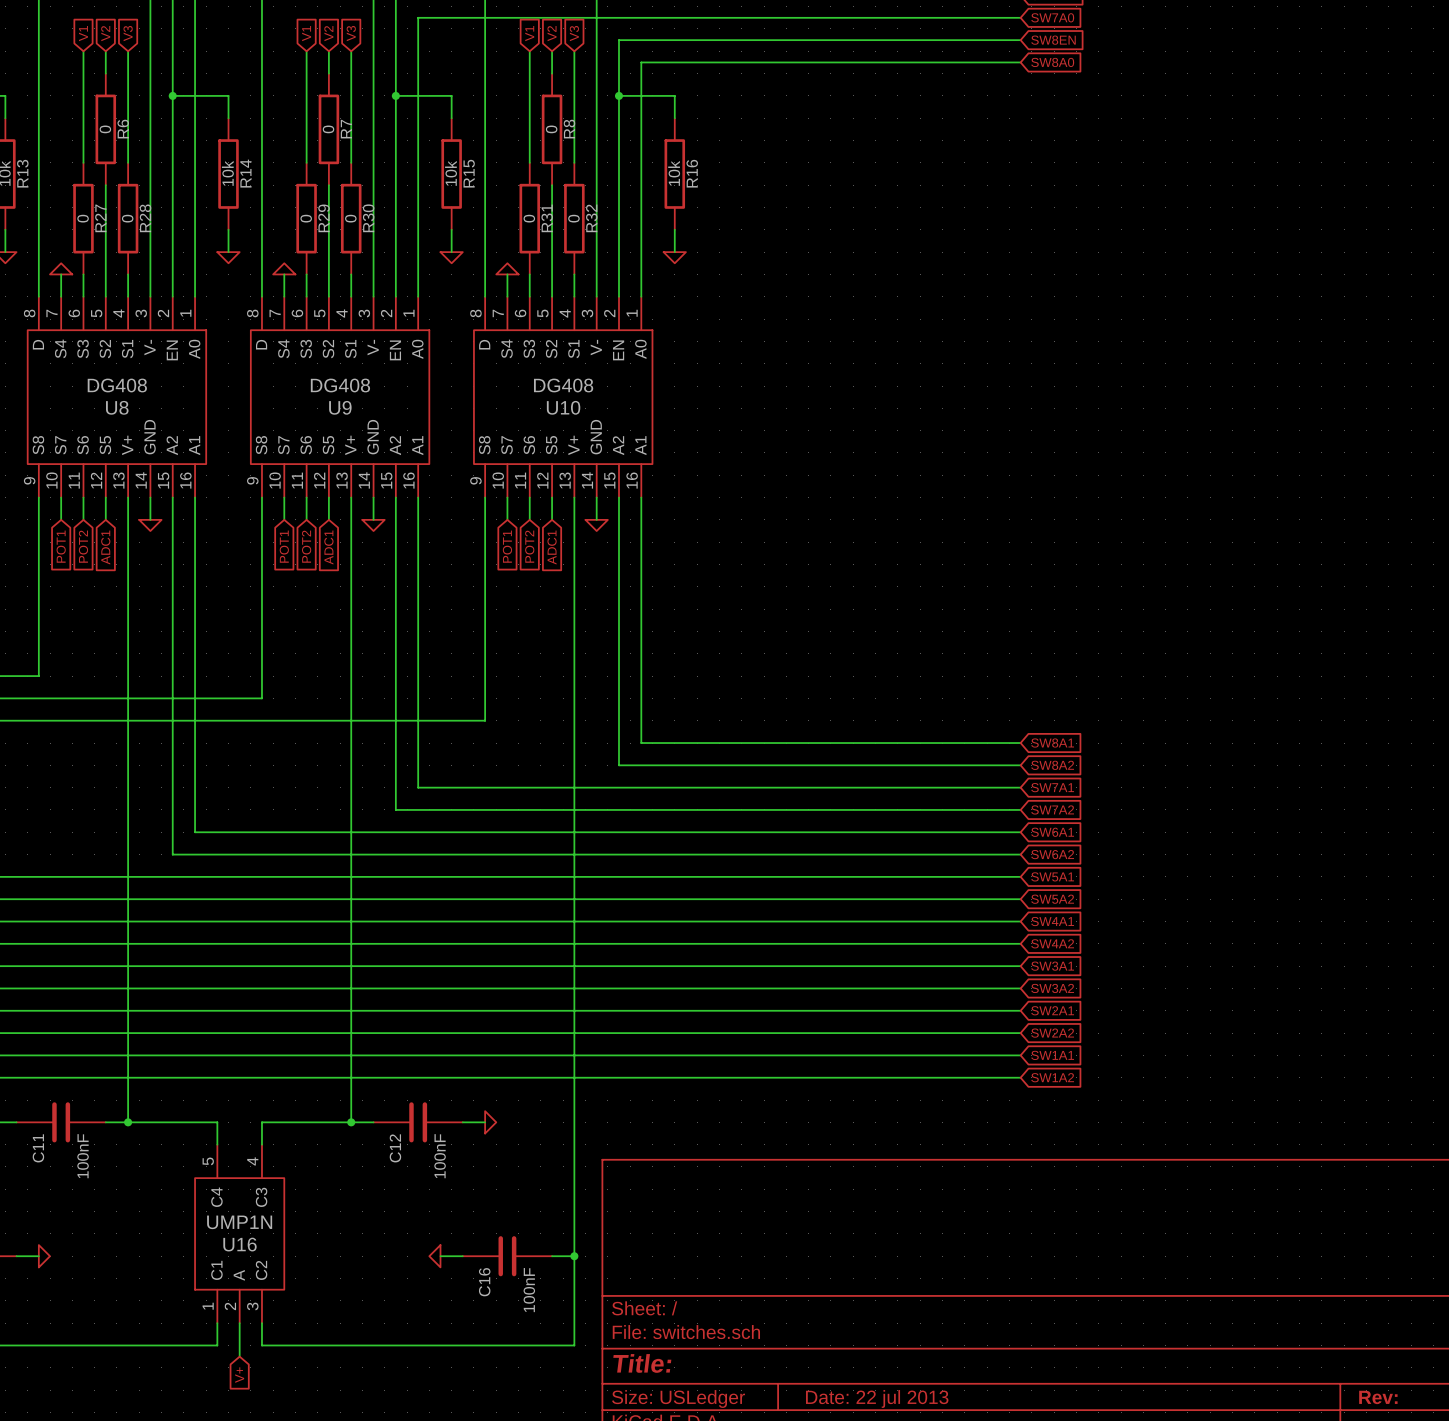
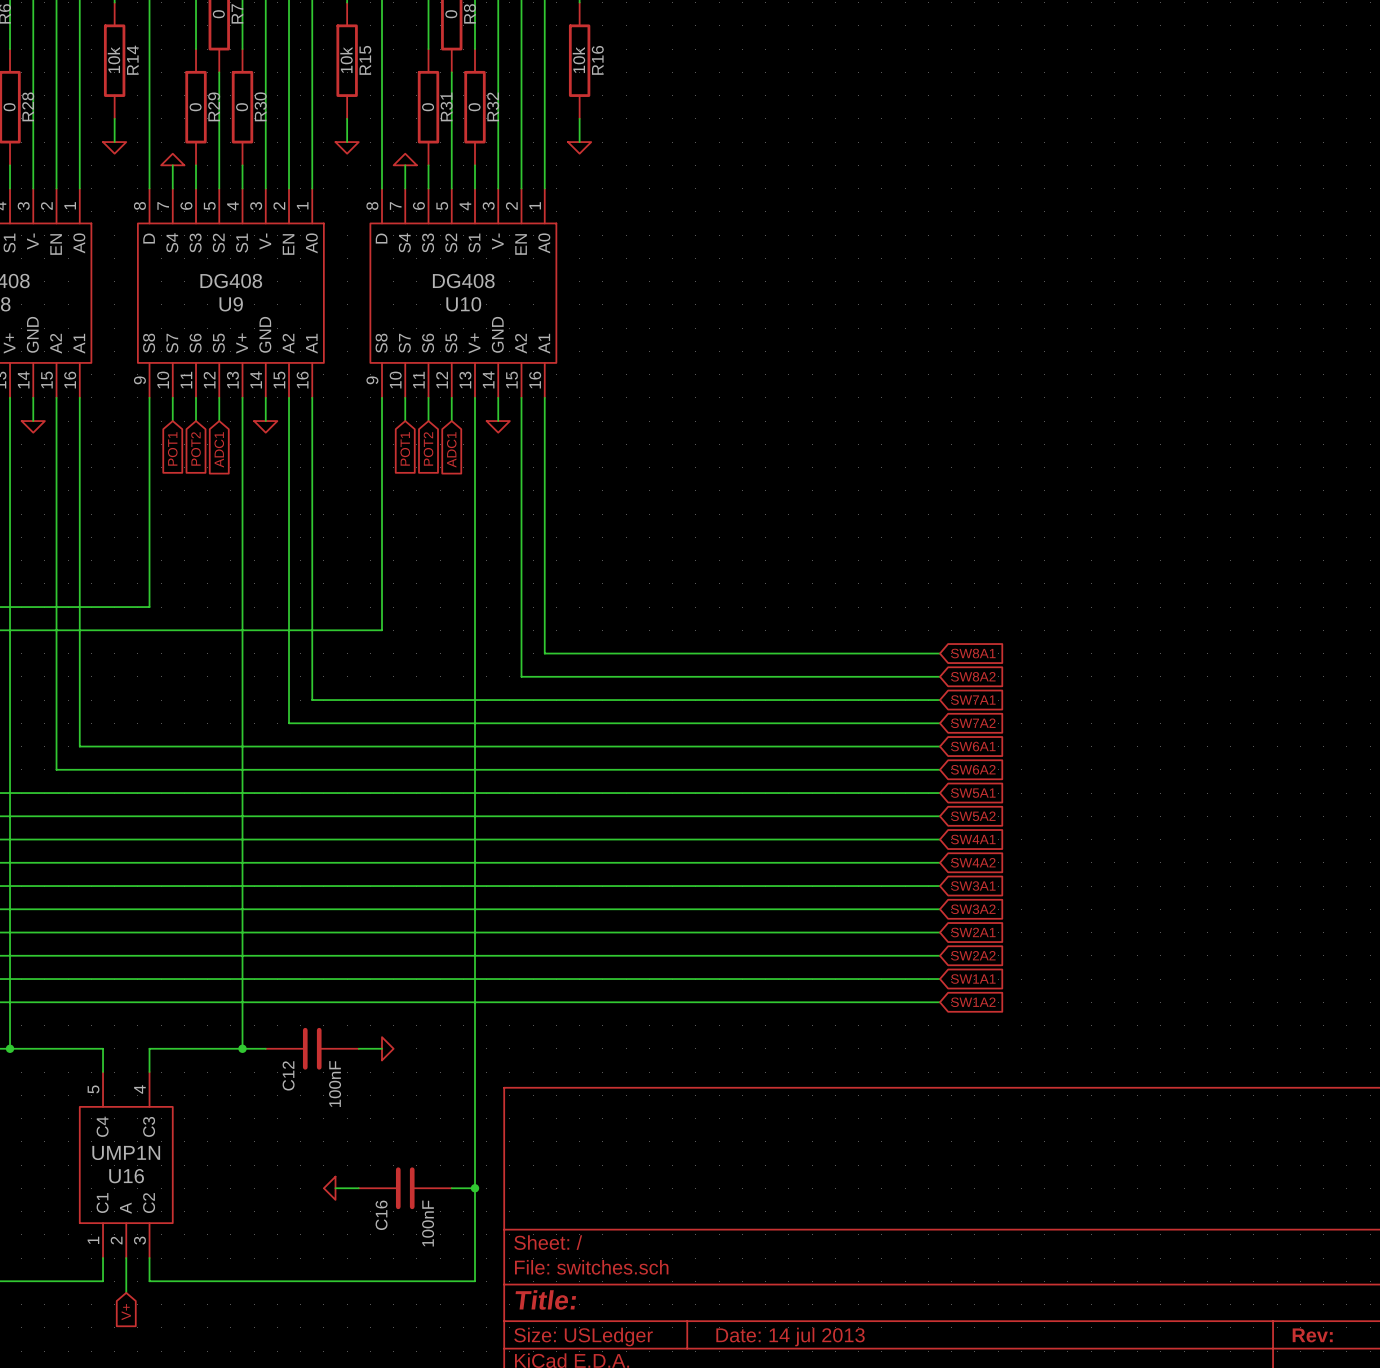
title block: Date: 22 jul 2013 (877, 1398) -> Date: 14 jul 2013 (790, 1337)

